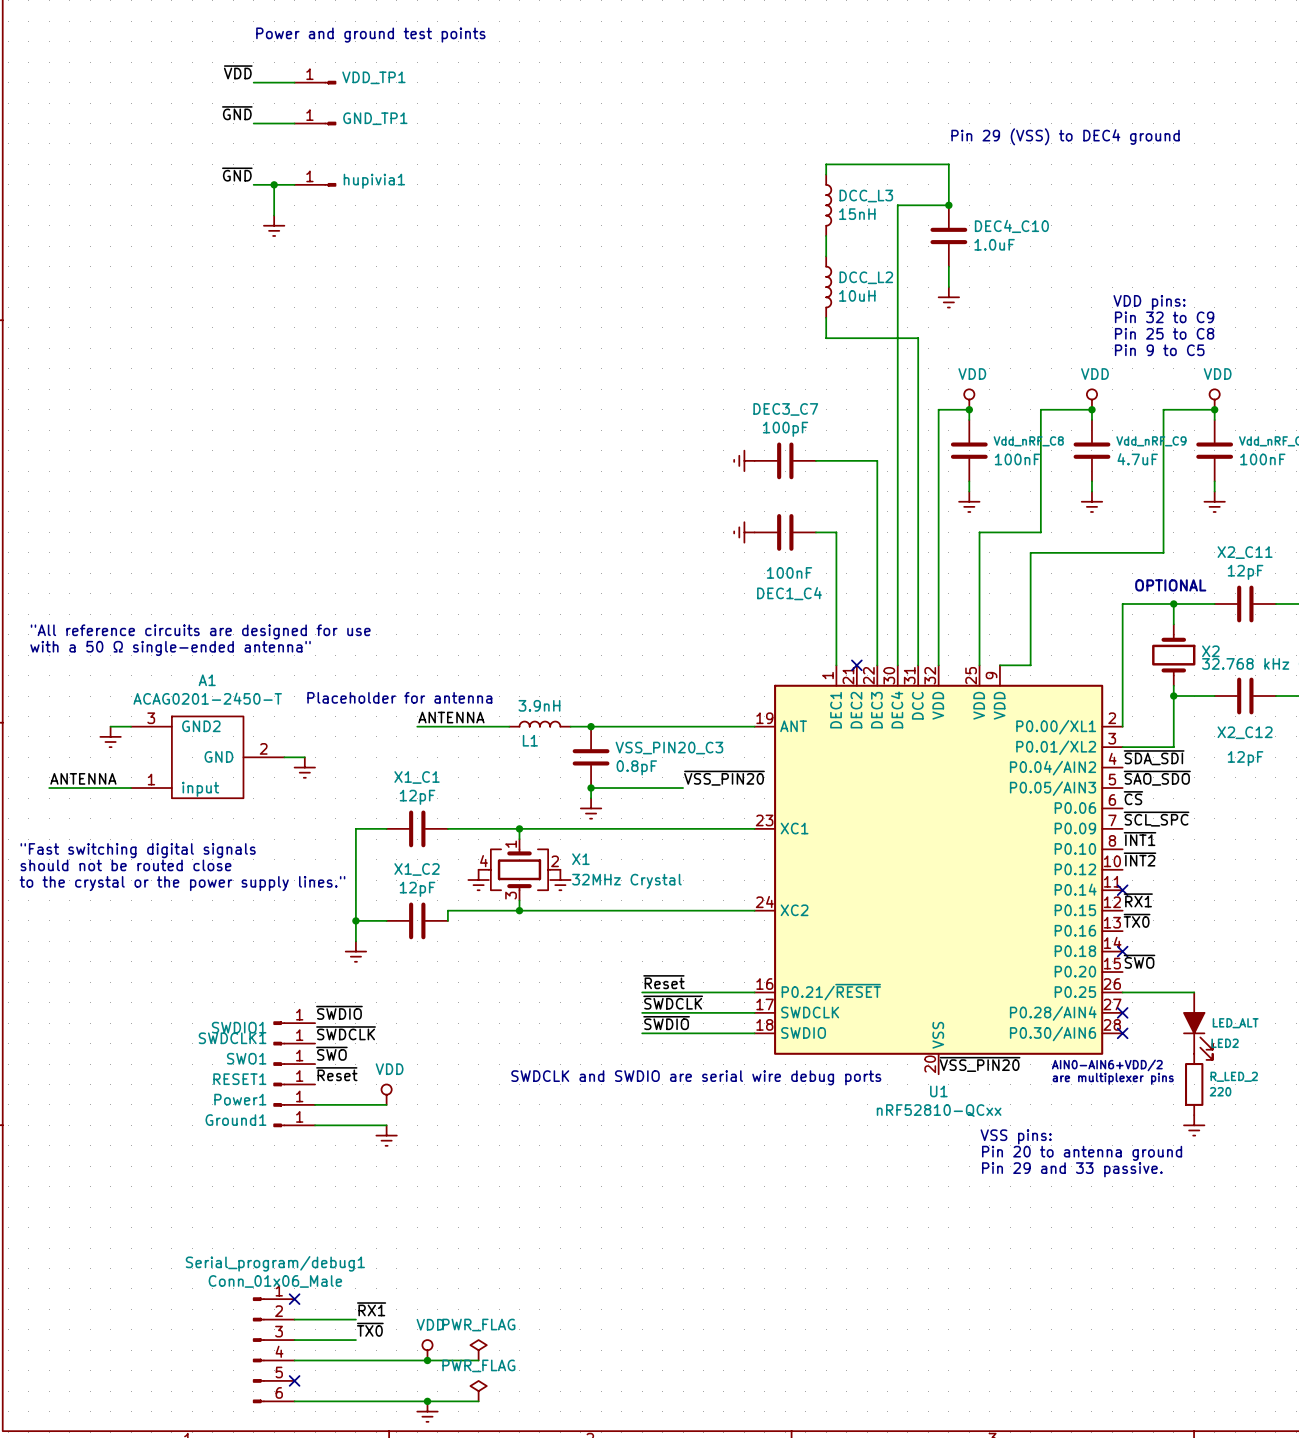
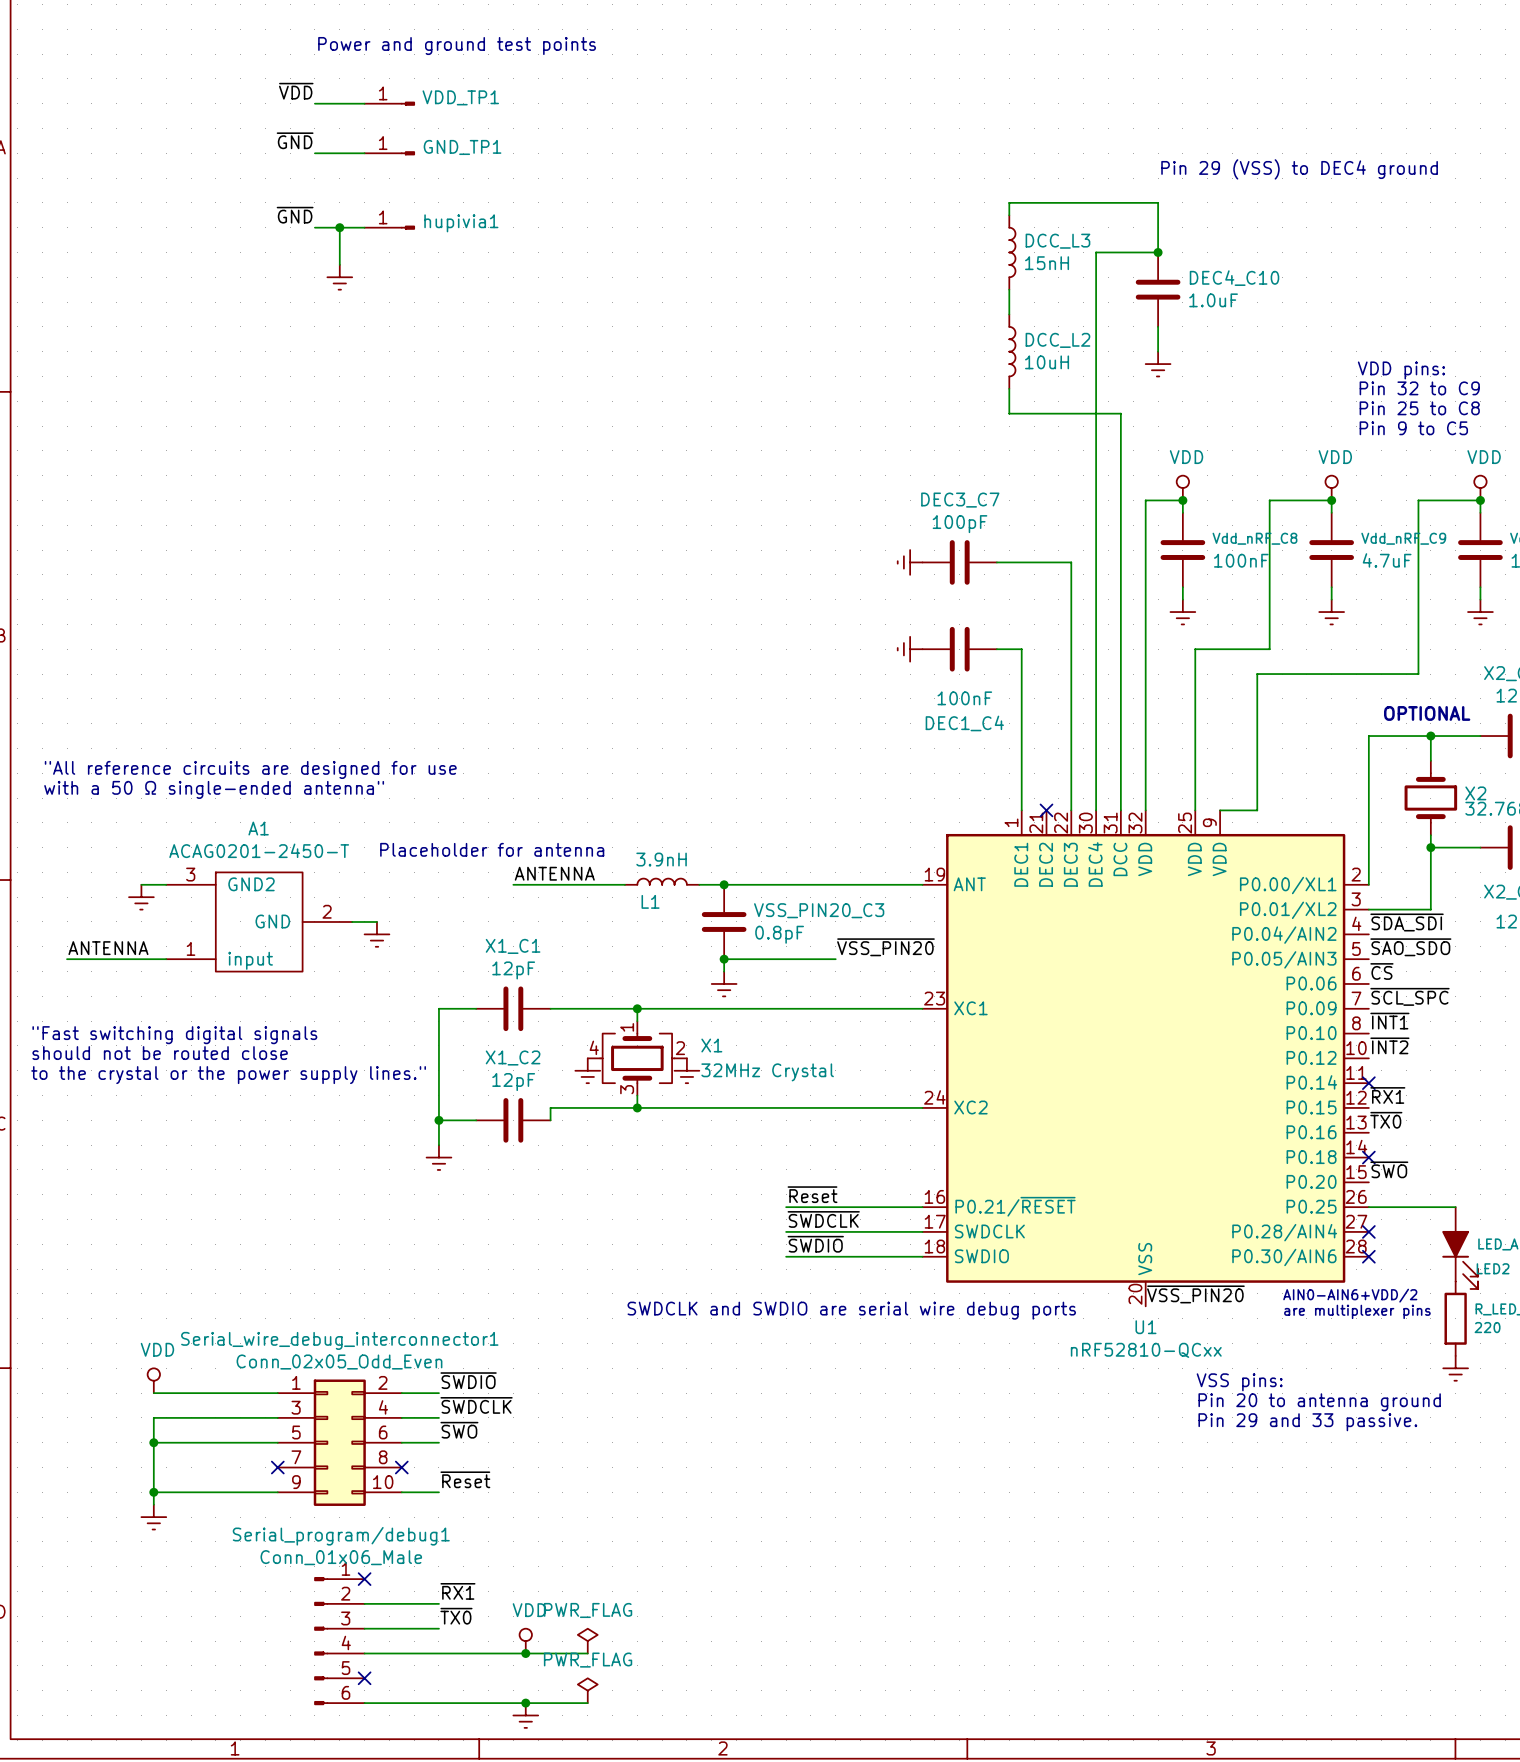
label position: ~{SWDIO} (339, 1012) -> ~{SWDIO} (468, 1380)
SWDIO1: (294, 1023) -> none
label position: ~{SWDCLK} (346, 1033) -> ~{SWDCLK} (476, 1405)
SWDCLK1: (294, 1043) -> none
label position: ~{SWO} (331, 1053) -> ~{SWO} (459, 1430)
SWO1: (294, 1064) -> none
label position: ~{Reset} (336, 1074) -> ~{Reset} (465, 1479)
RESET1: (294, 1084) -> none
power symbol: VDD (386, 1094) -> none
Power1: (294, 1104) -> none
wire: (315, 1104) (386, 1104) -> none
Ground1: (294, 1125) -> none
wire: (315, 1125) (386, 1125) -> none
power symbol: none -> VDD (153, 1380)
power symbol: (386, 1135) -> none
wire: none -> (153, 1393) (277, 1393)
wire: none -> (401, 1393) (438, 1393)
wire: none -> (277, 1417) (153, 1417) (153, 1504)
wire: none -> (401, 1417) (438, 1417)
wire: none -> (153, 1442) (277, 1442)
junction: none -> (153, 1442)
Serial_wire_debug_interconnector1: none -> Conn_02x05_Odd_Even (339, 1442)
wire: none -> (401, 1442) (438, 1442)
no-connect mark: none -> (277, 1467)
no-connect mark: none -> (401, 1467)
wire: none -> (153, 1492) (277, 1492)
junction: none -> (153, 1492)
wire: none -> (401, 1492) (438, 1492)
power symbol: none -> (153, 1517)

